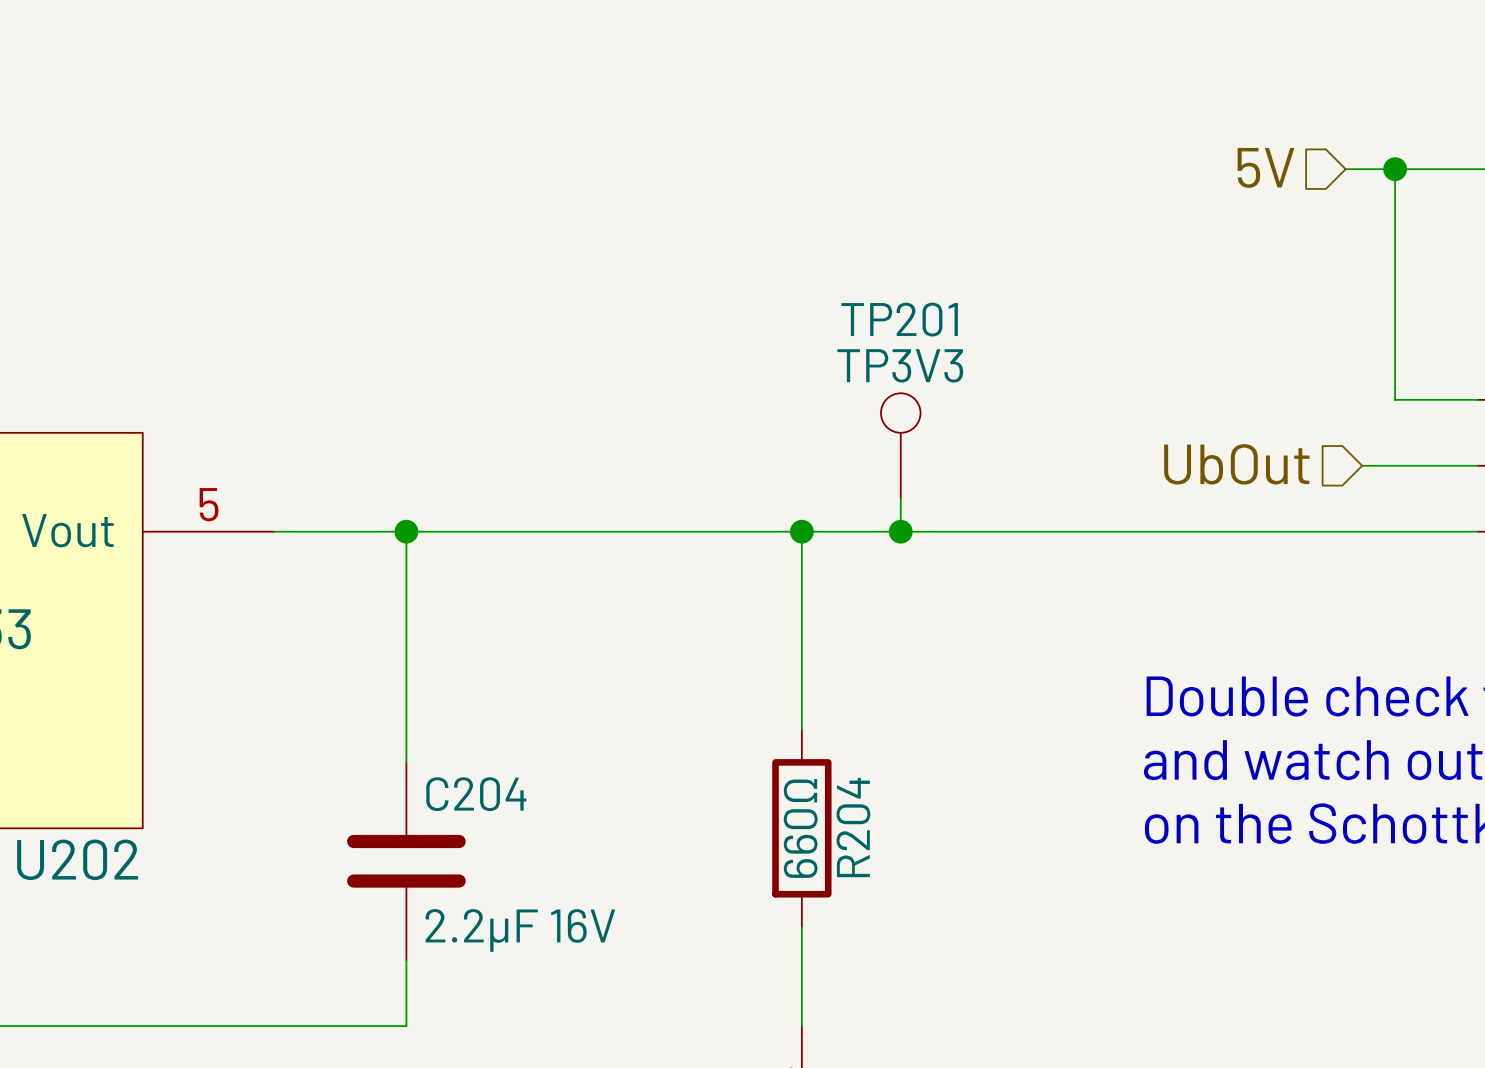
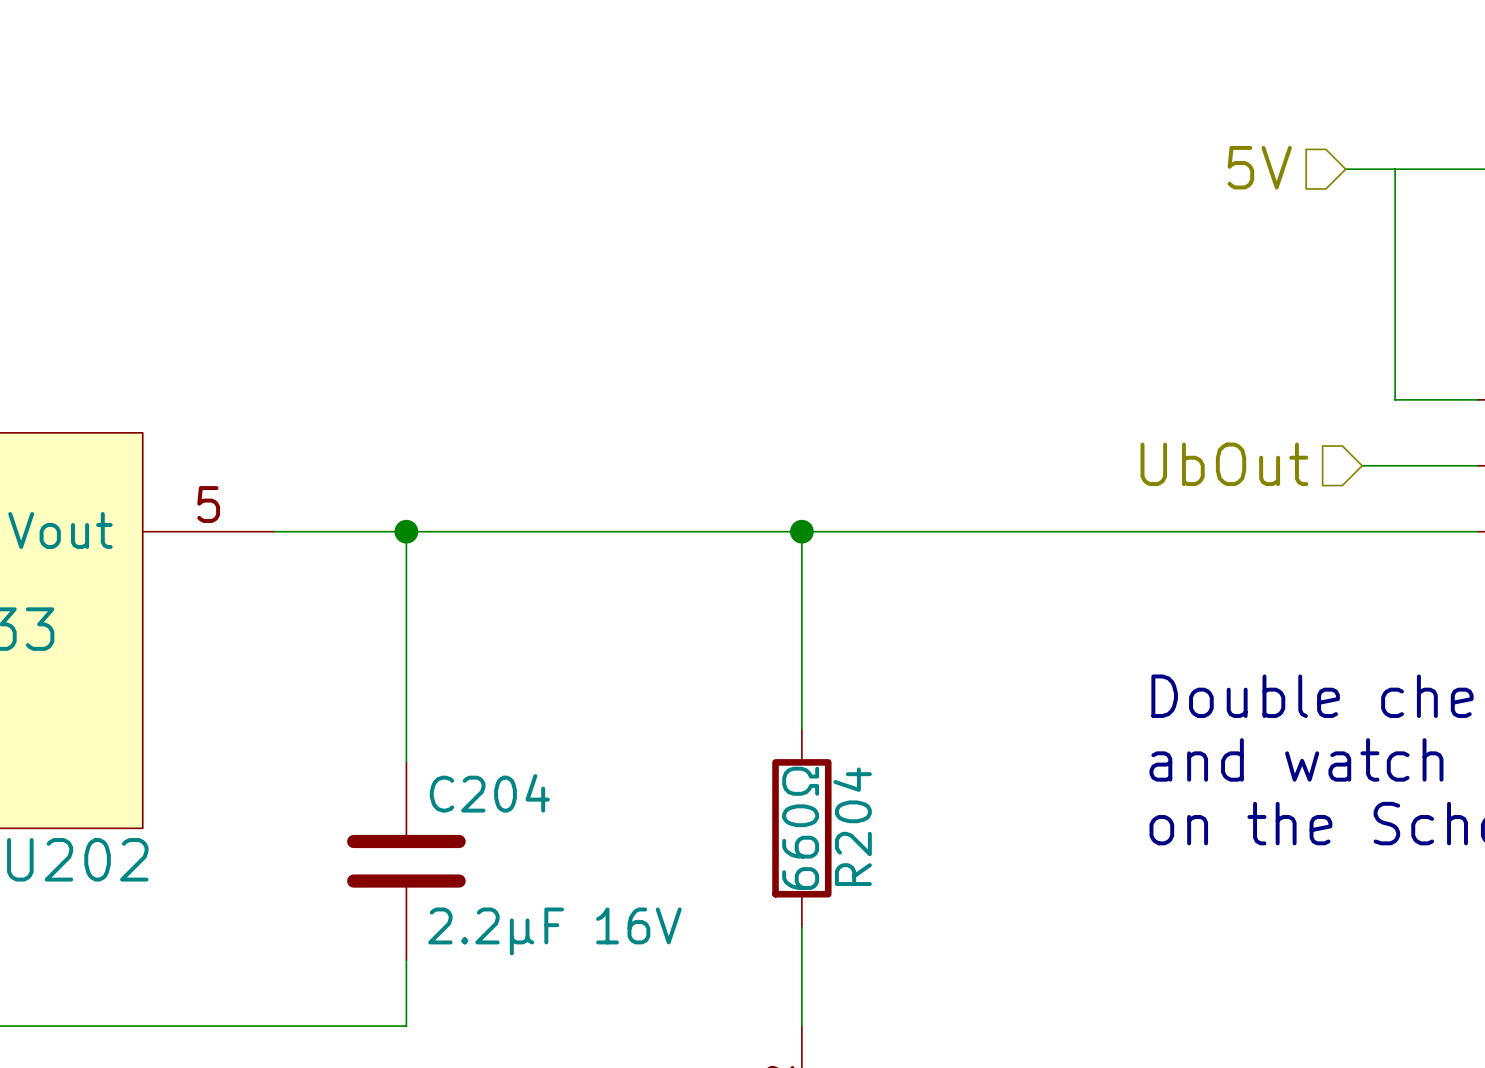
junction: (1395, 169) -> none
TP201: TP3V3 (900, 446) -> none
wire: (900, 498) (900, 531) -> none
junction: (900, 531) -> none

